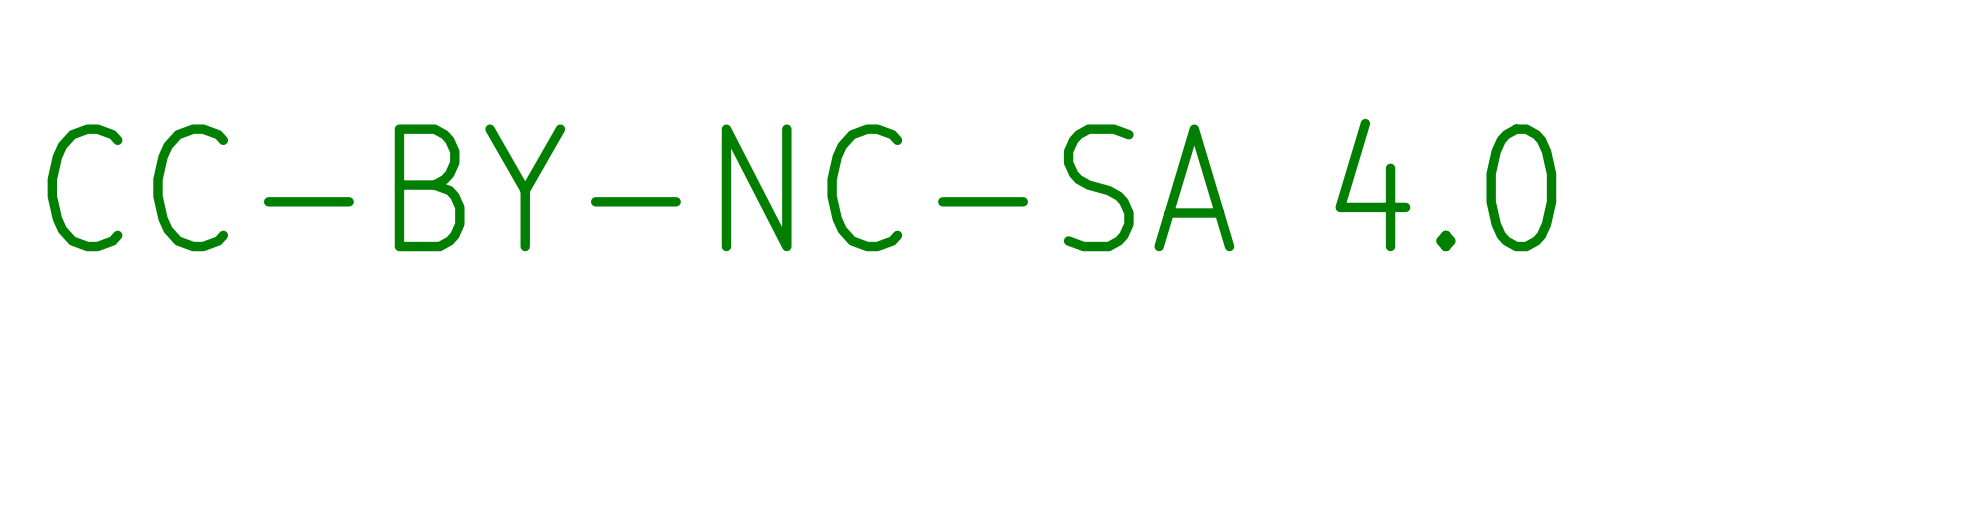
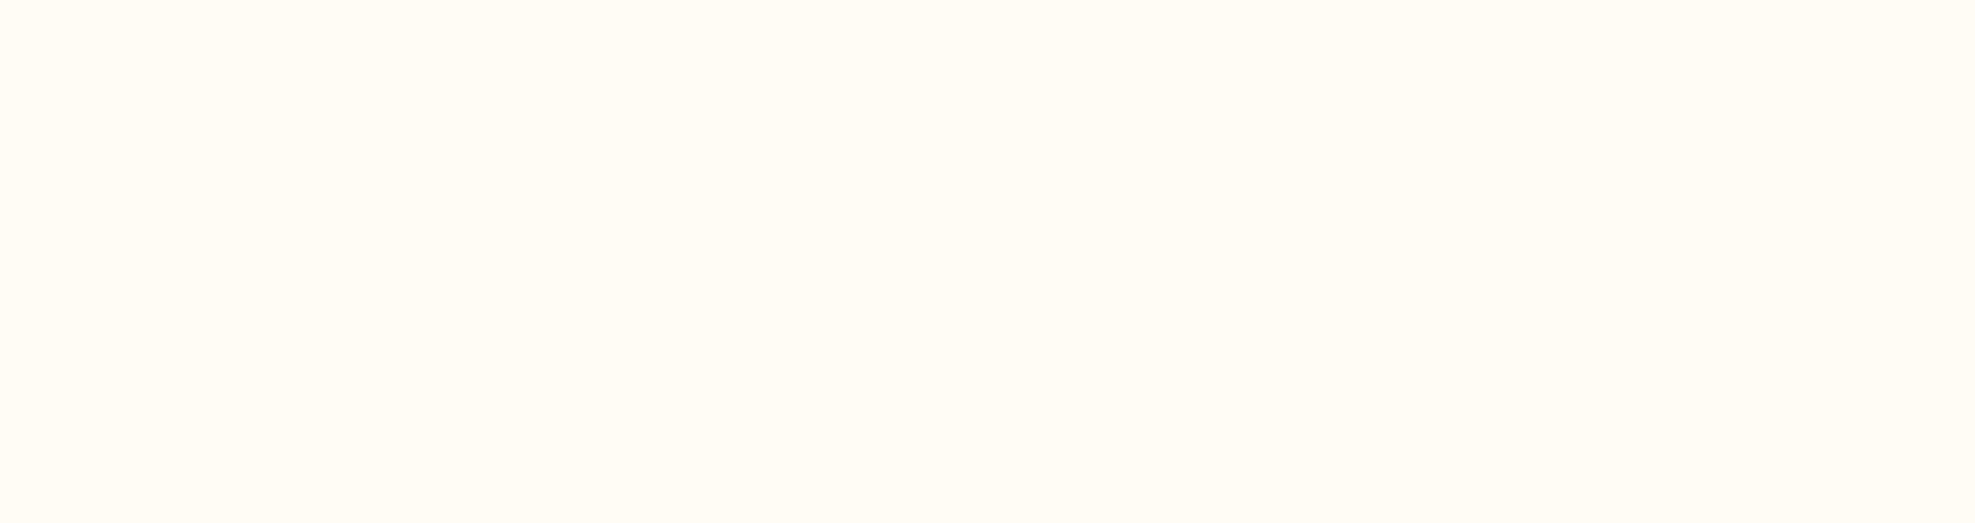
text: CC-BY-NC-SA 4.0 (801, 185) -> none

